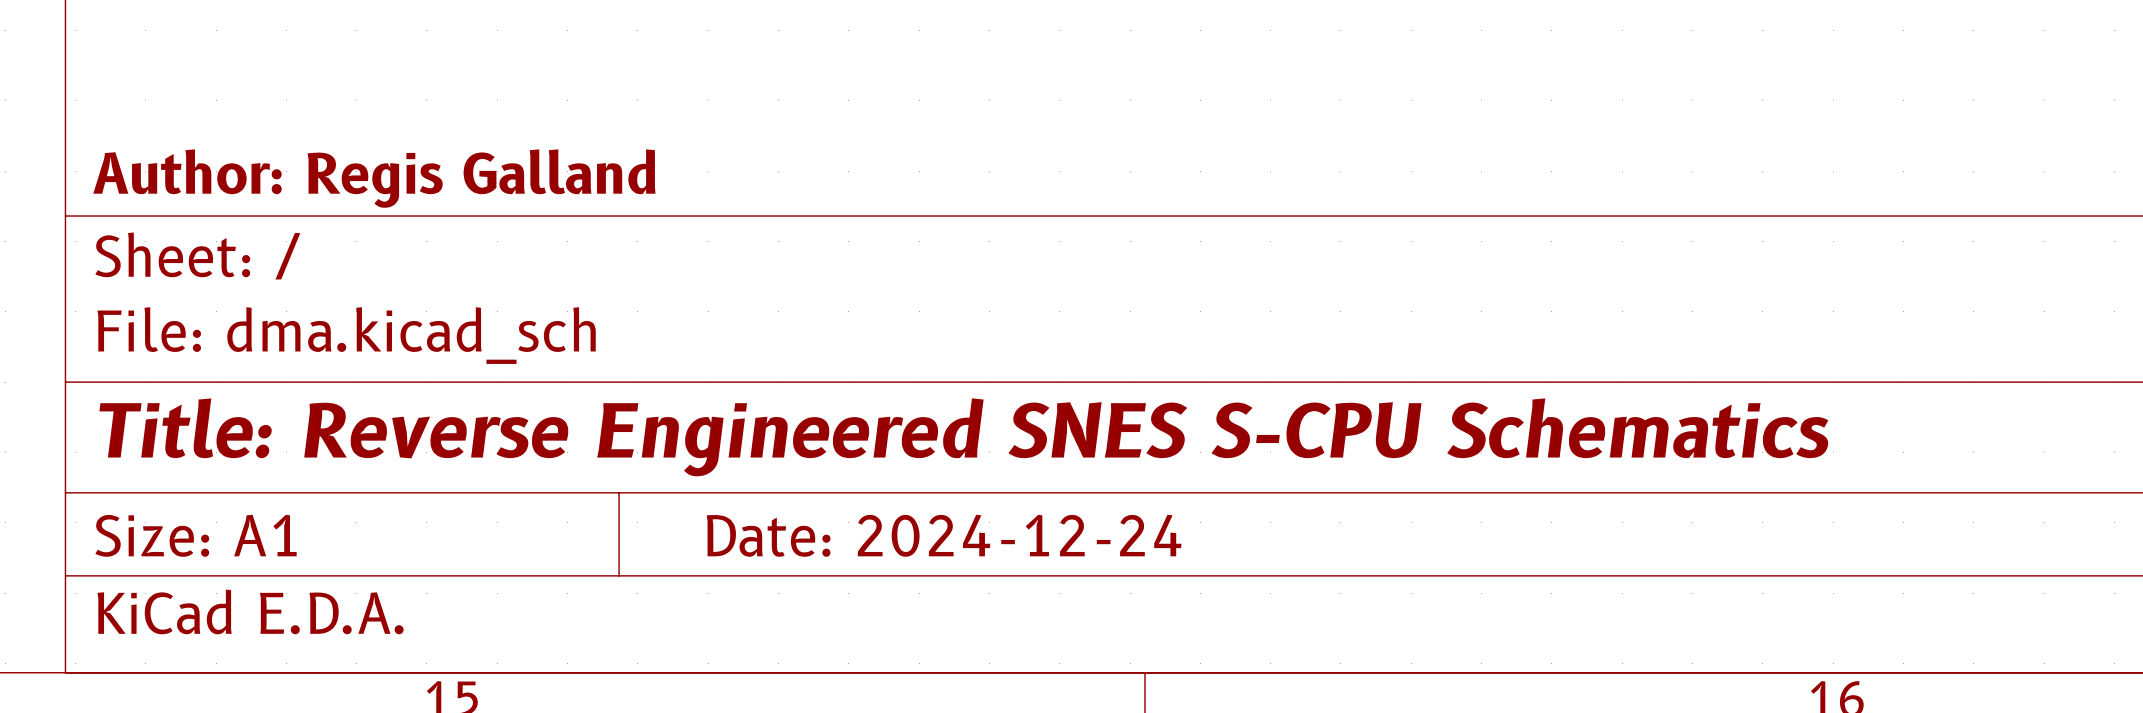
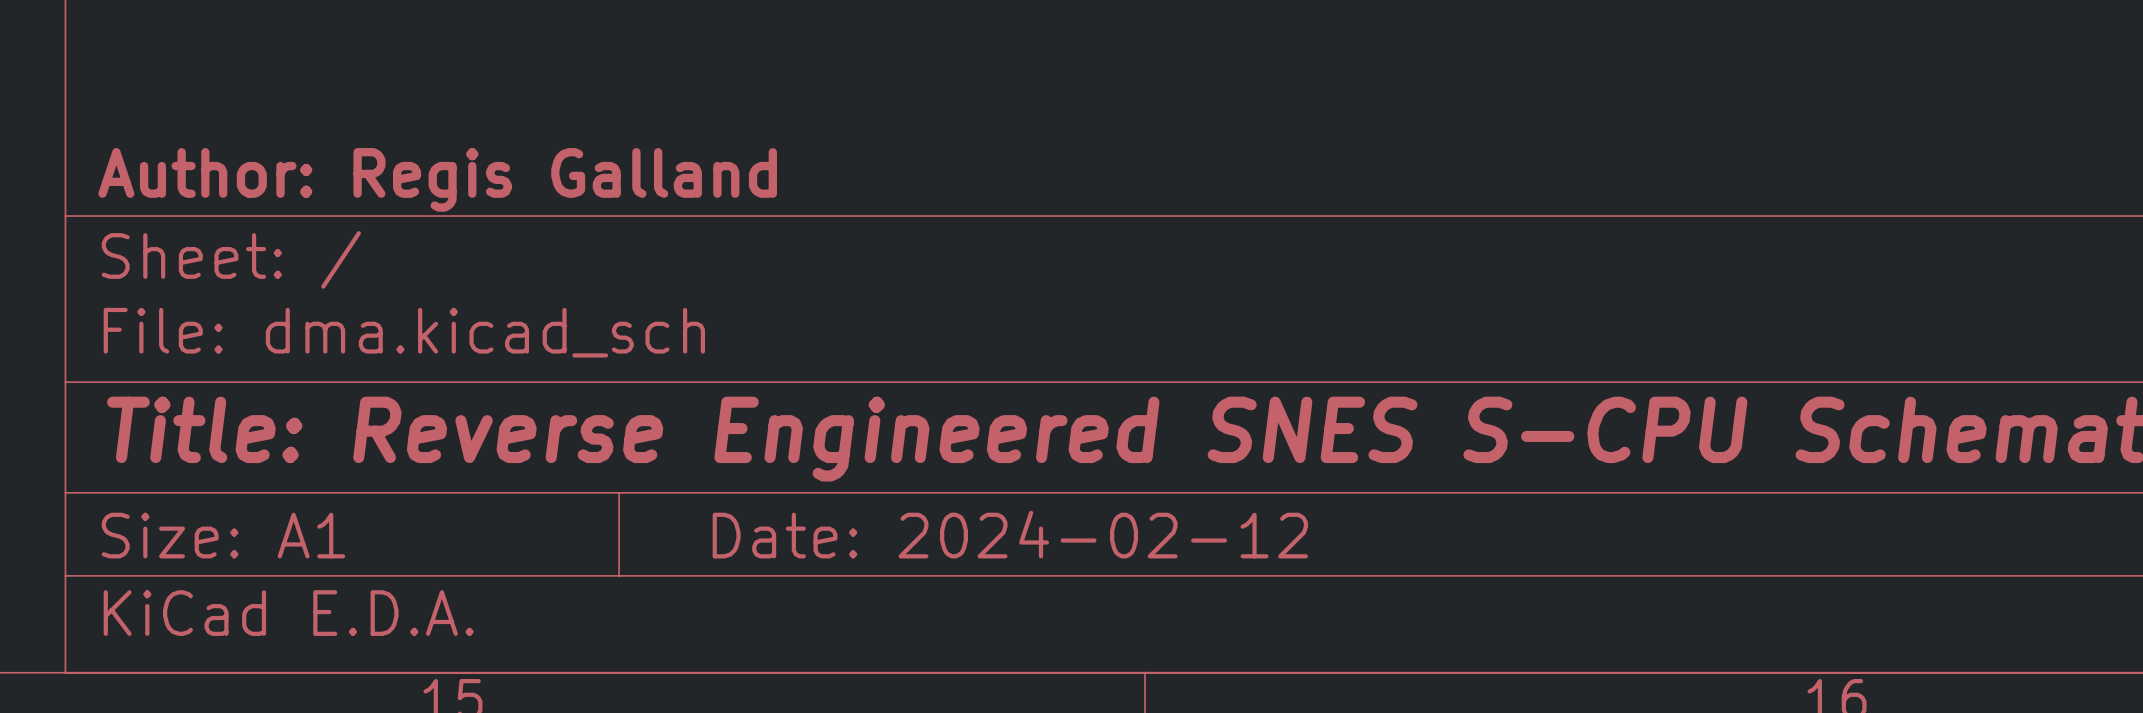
title block: Date: 2024-12-24 (944, 535) -> Date: 2024-02-12 (1010, 534)

